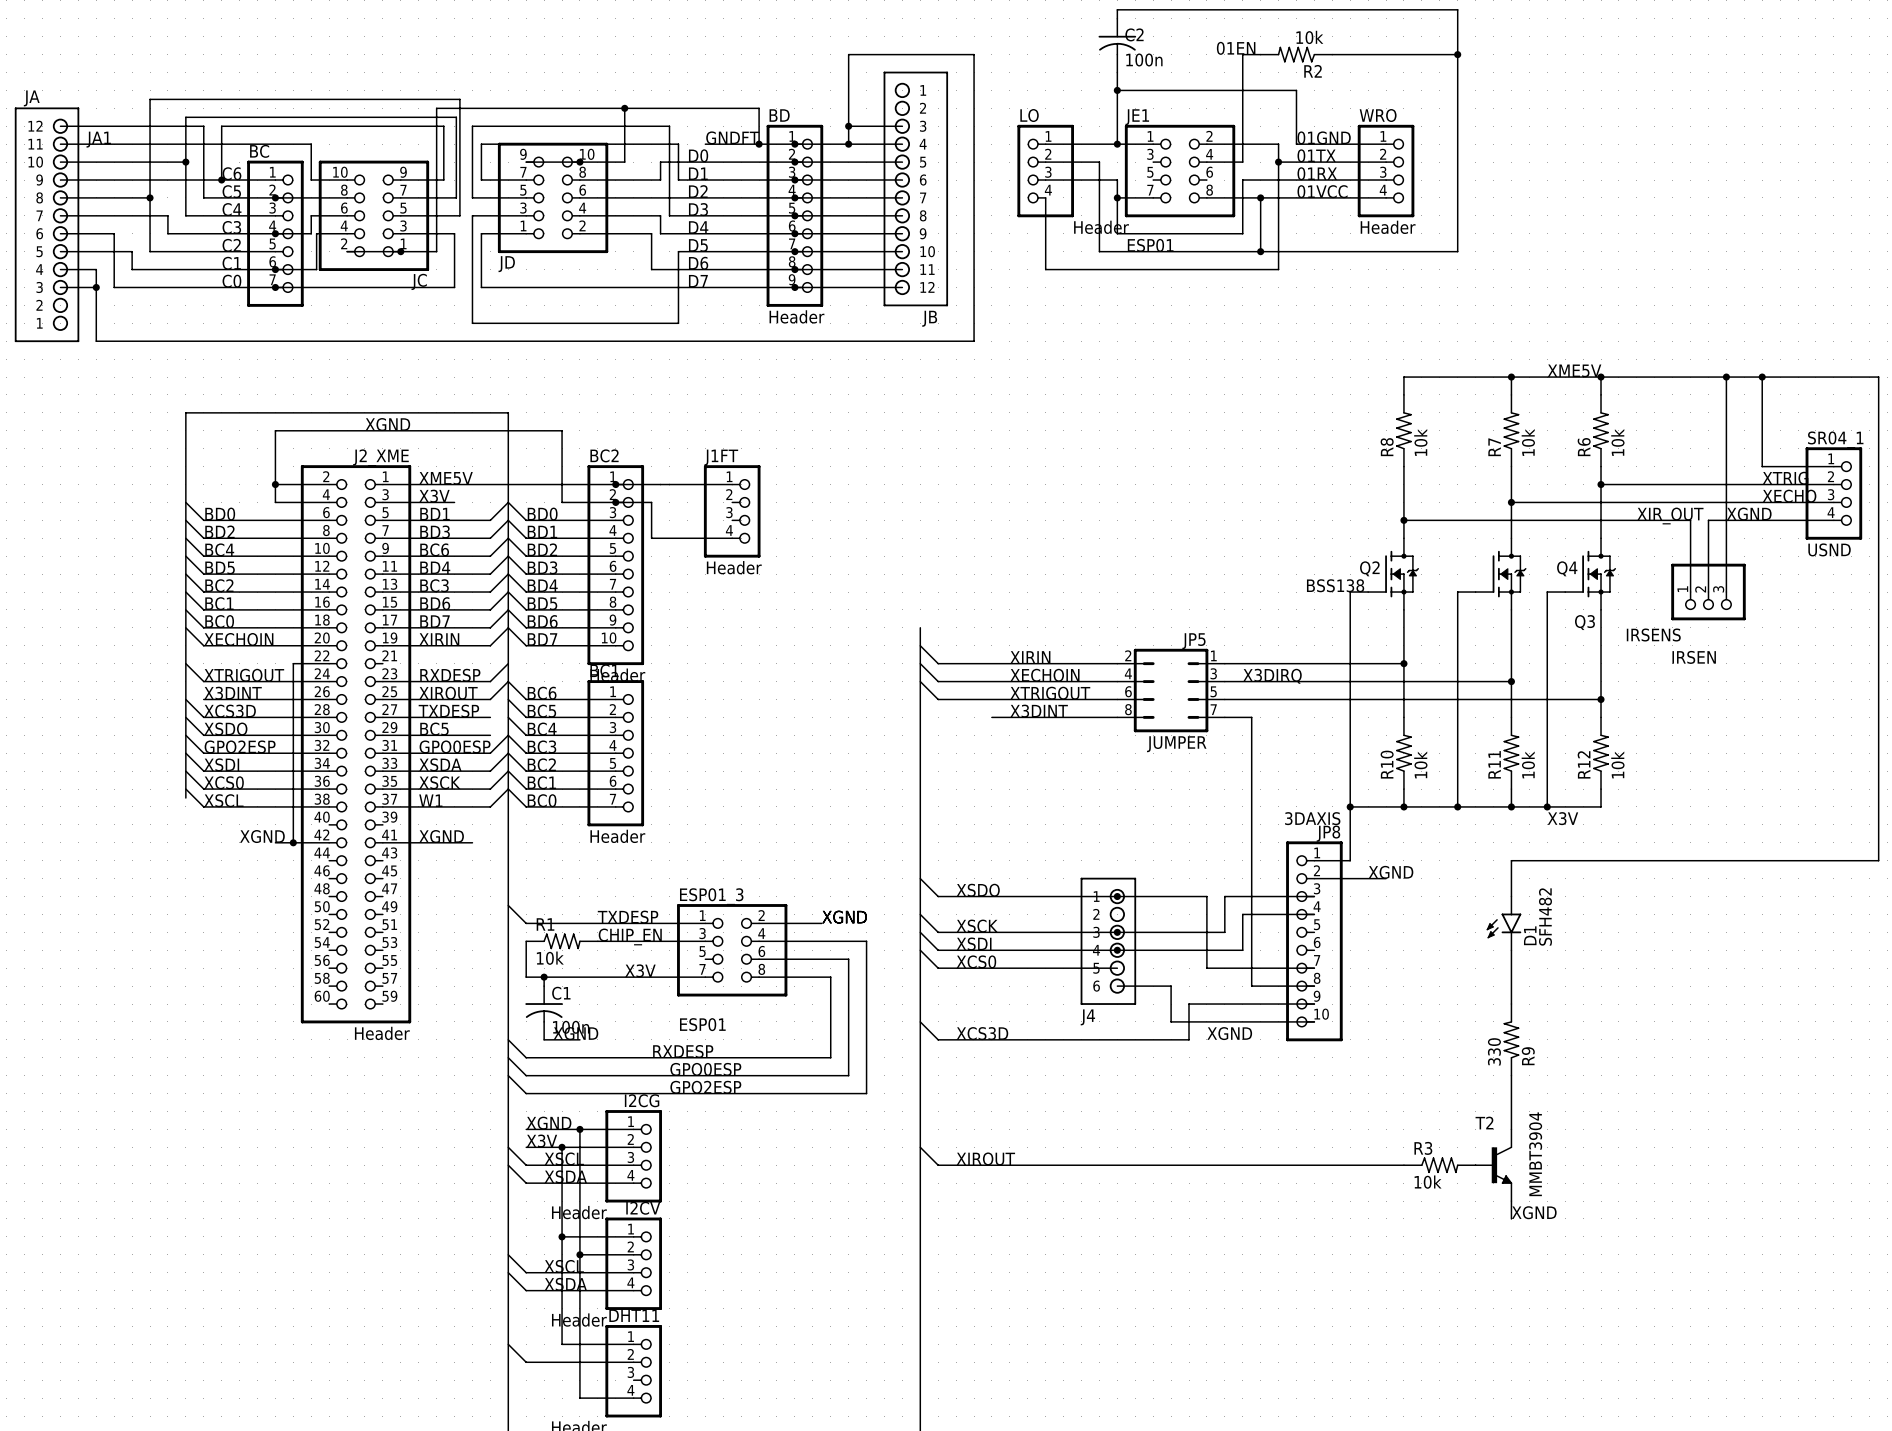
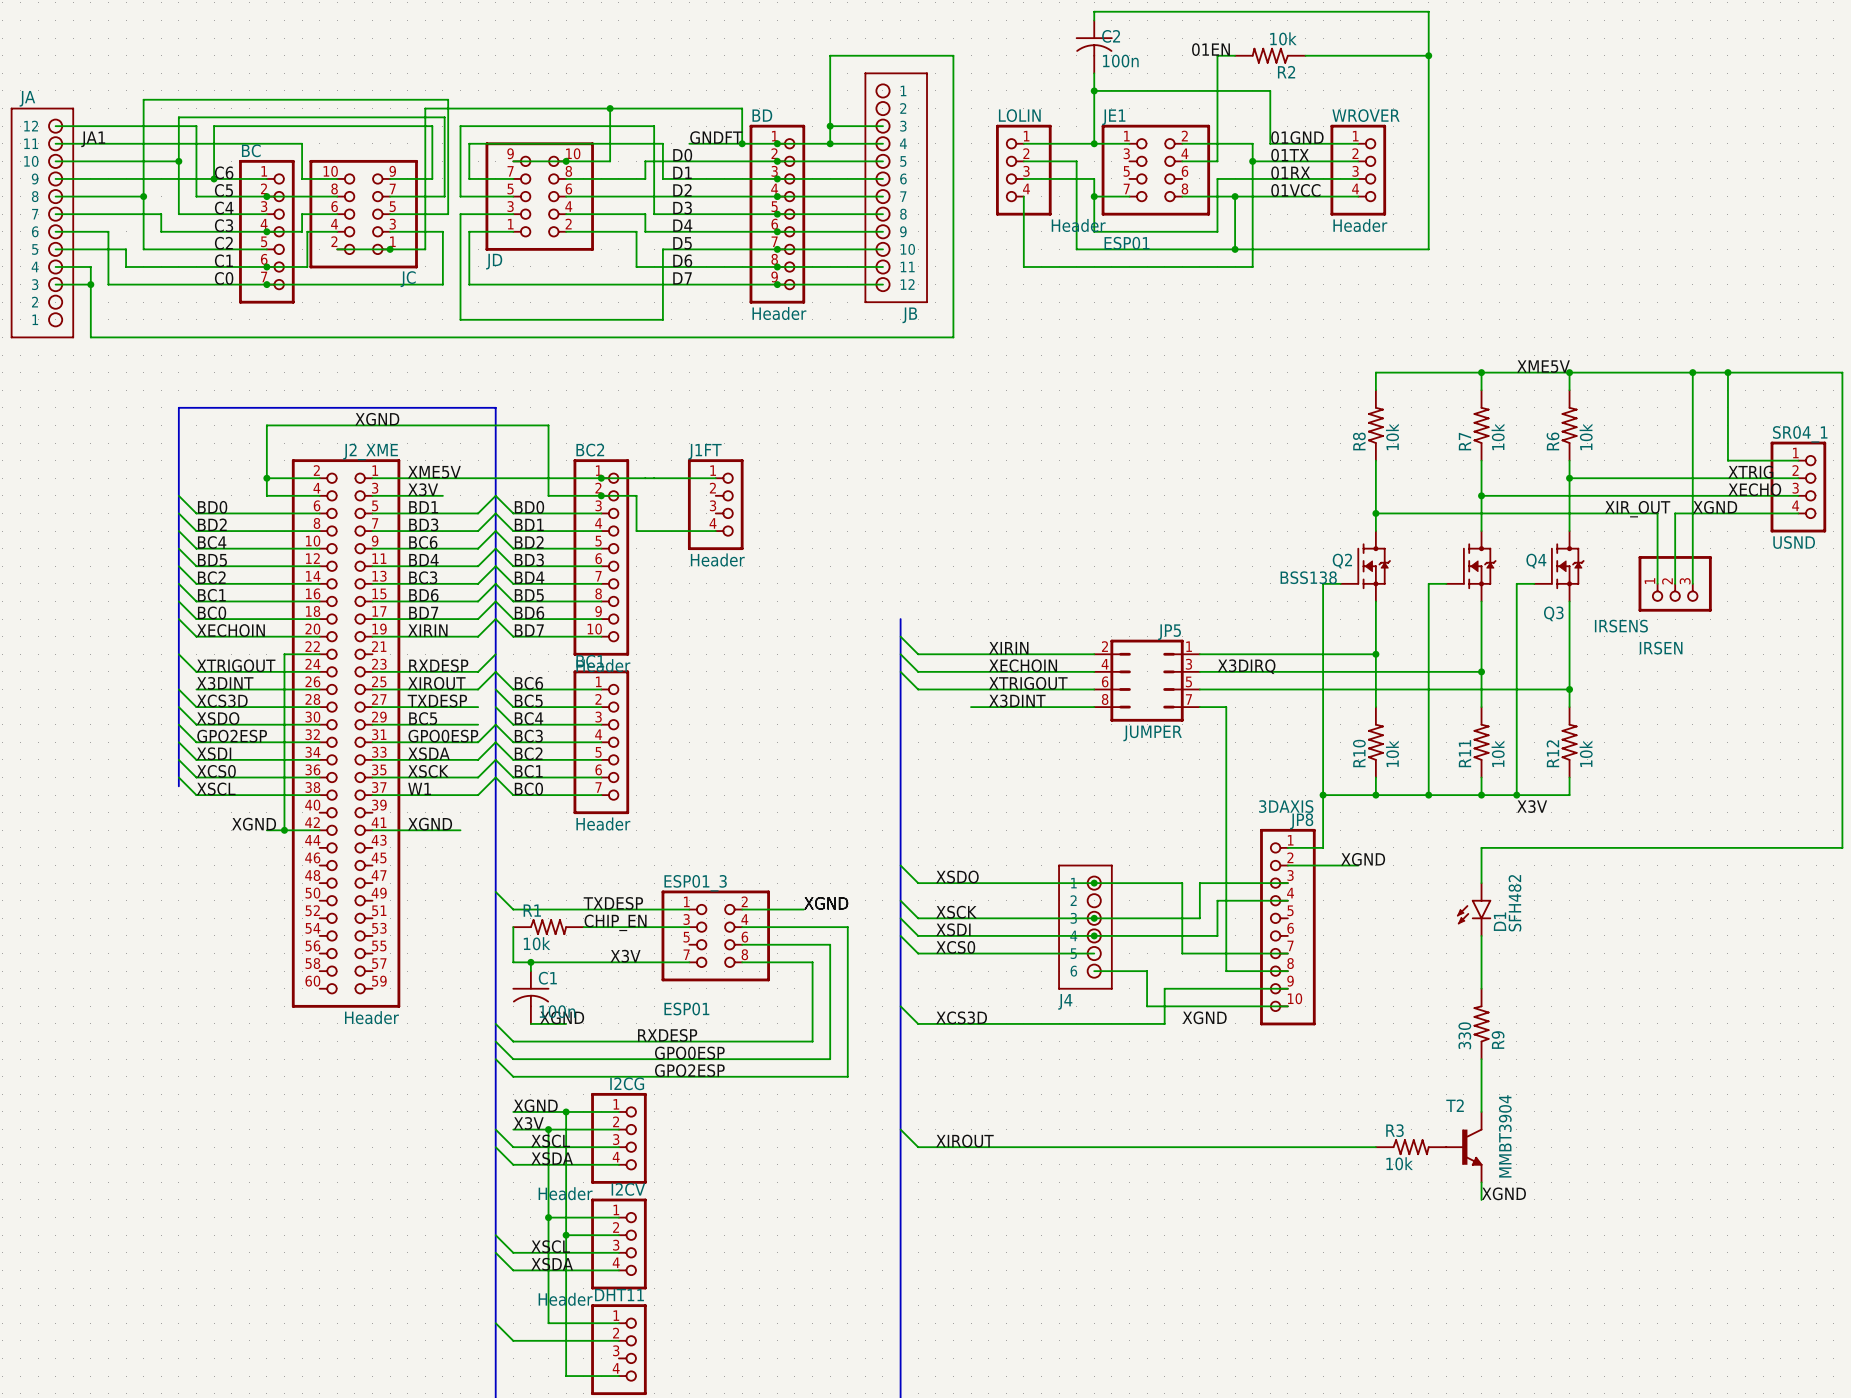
LO name: LO (1029, 115) -> LOLIN (1019, 115)
WRO name: WRO (1378, 115) -> WROVER (1366, 115)

